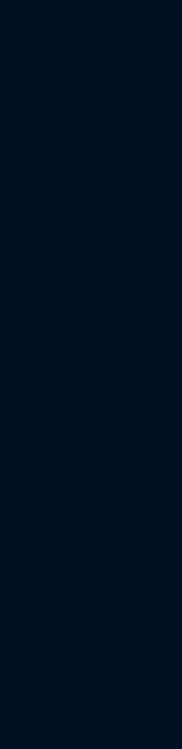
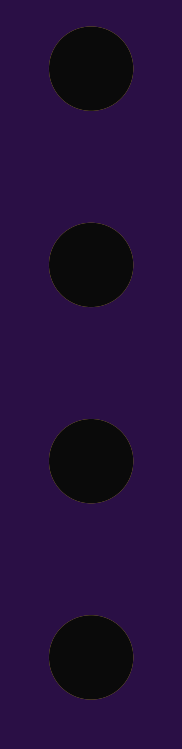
part: none -> (91, 68)
part: none -> (91, 264)
part: none -> (91, 461)
part: none -> (91, 657)

